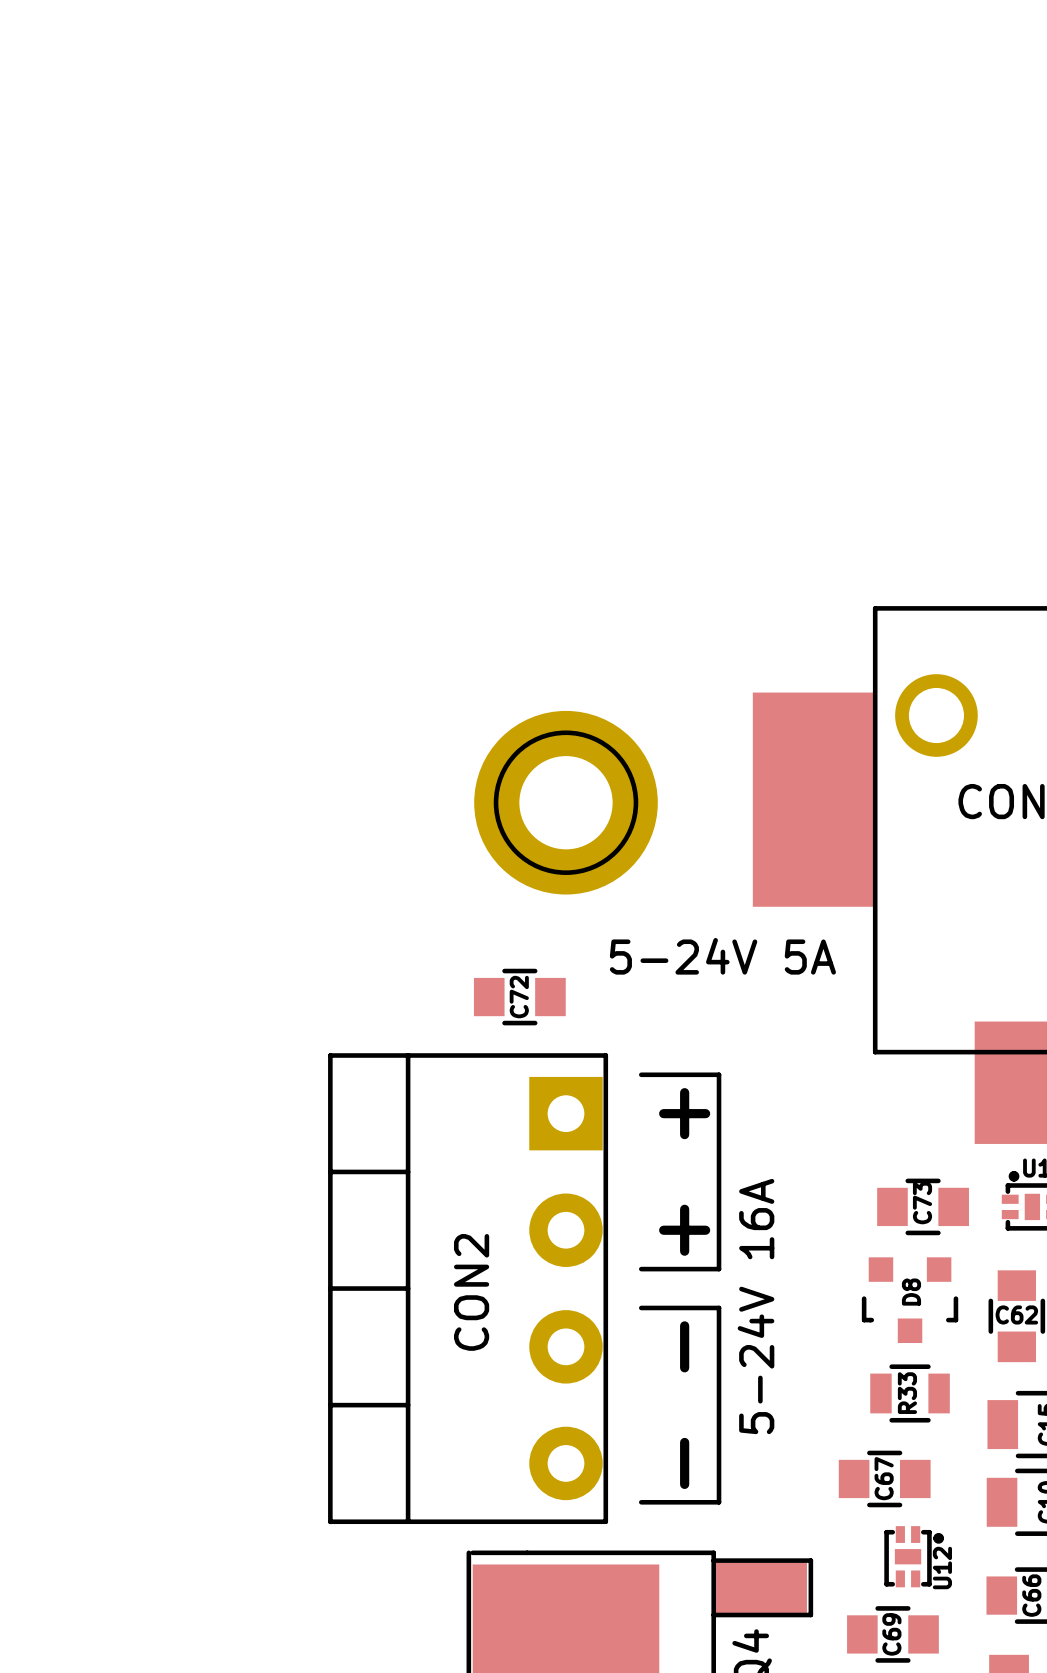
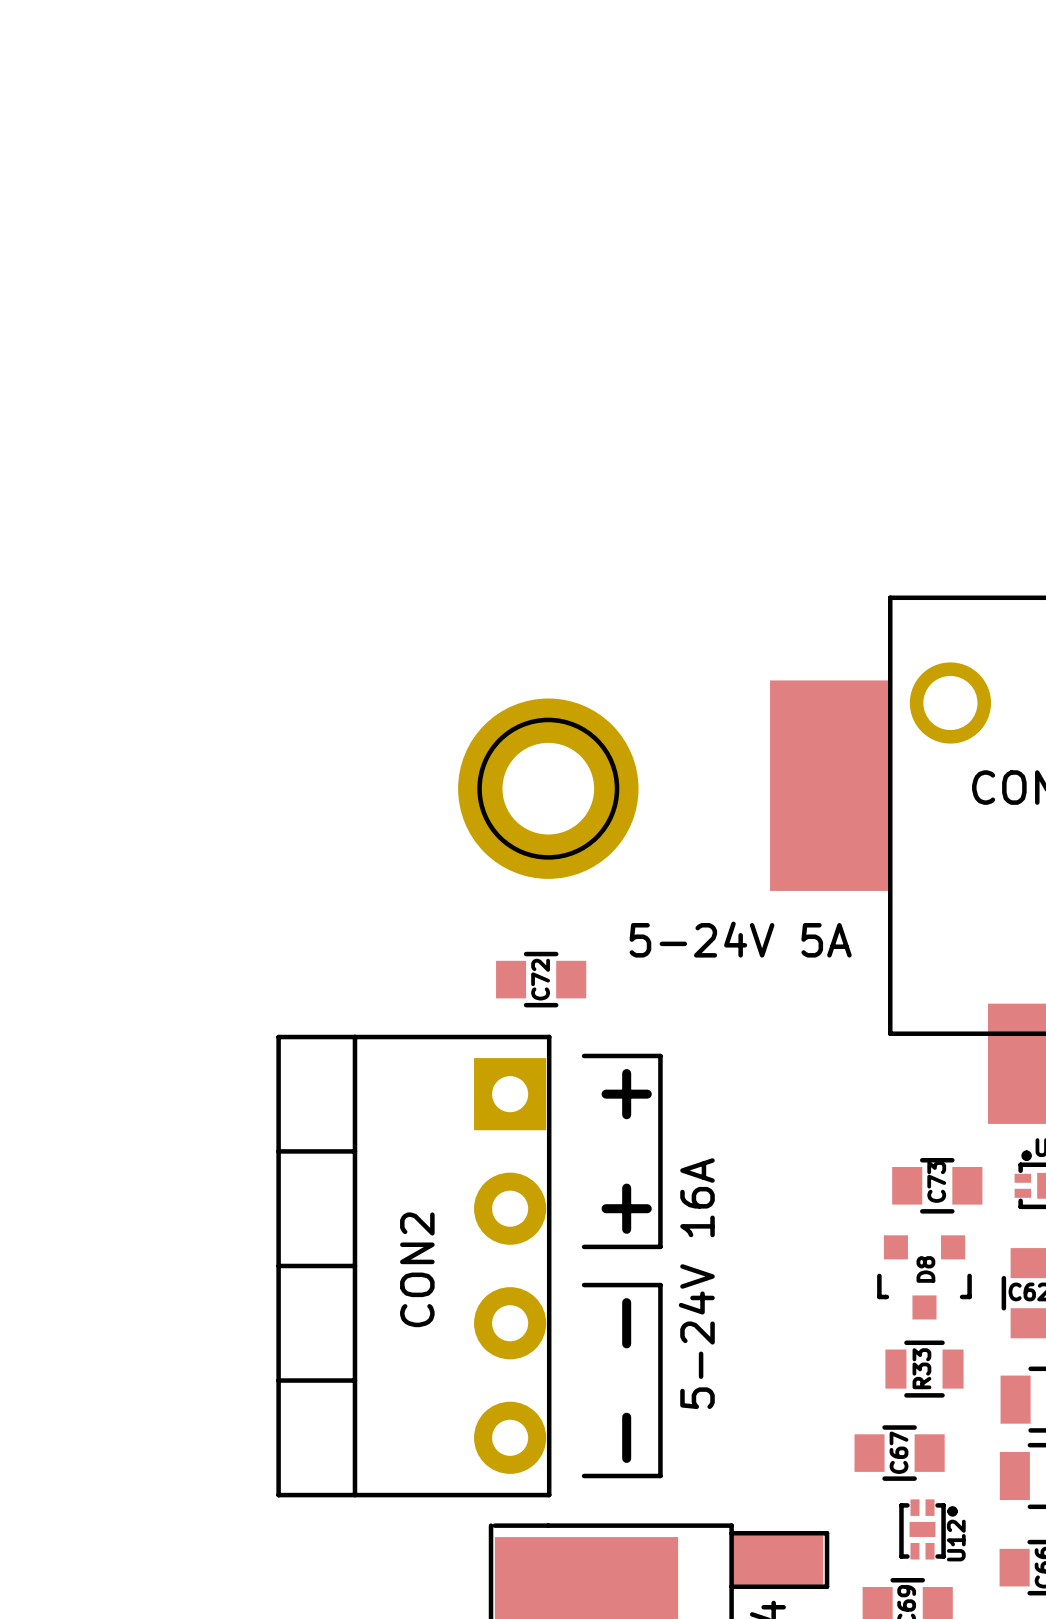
part position: (566, 802) -> (548, 788)
CON2 position: (524, 1288) -> (469, 1266)

